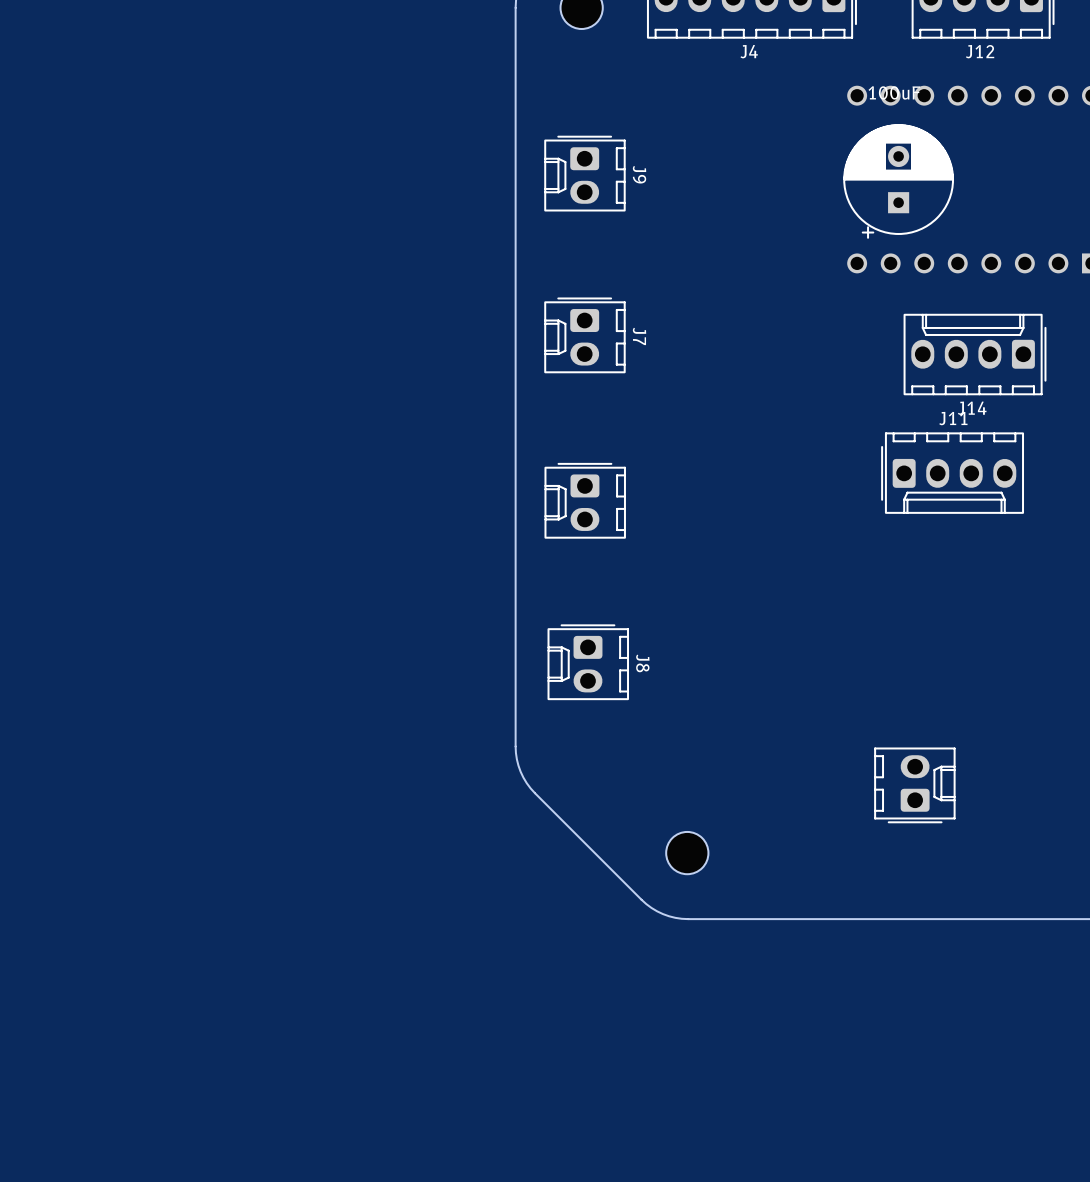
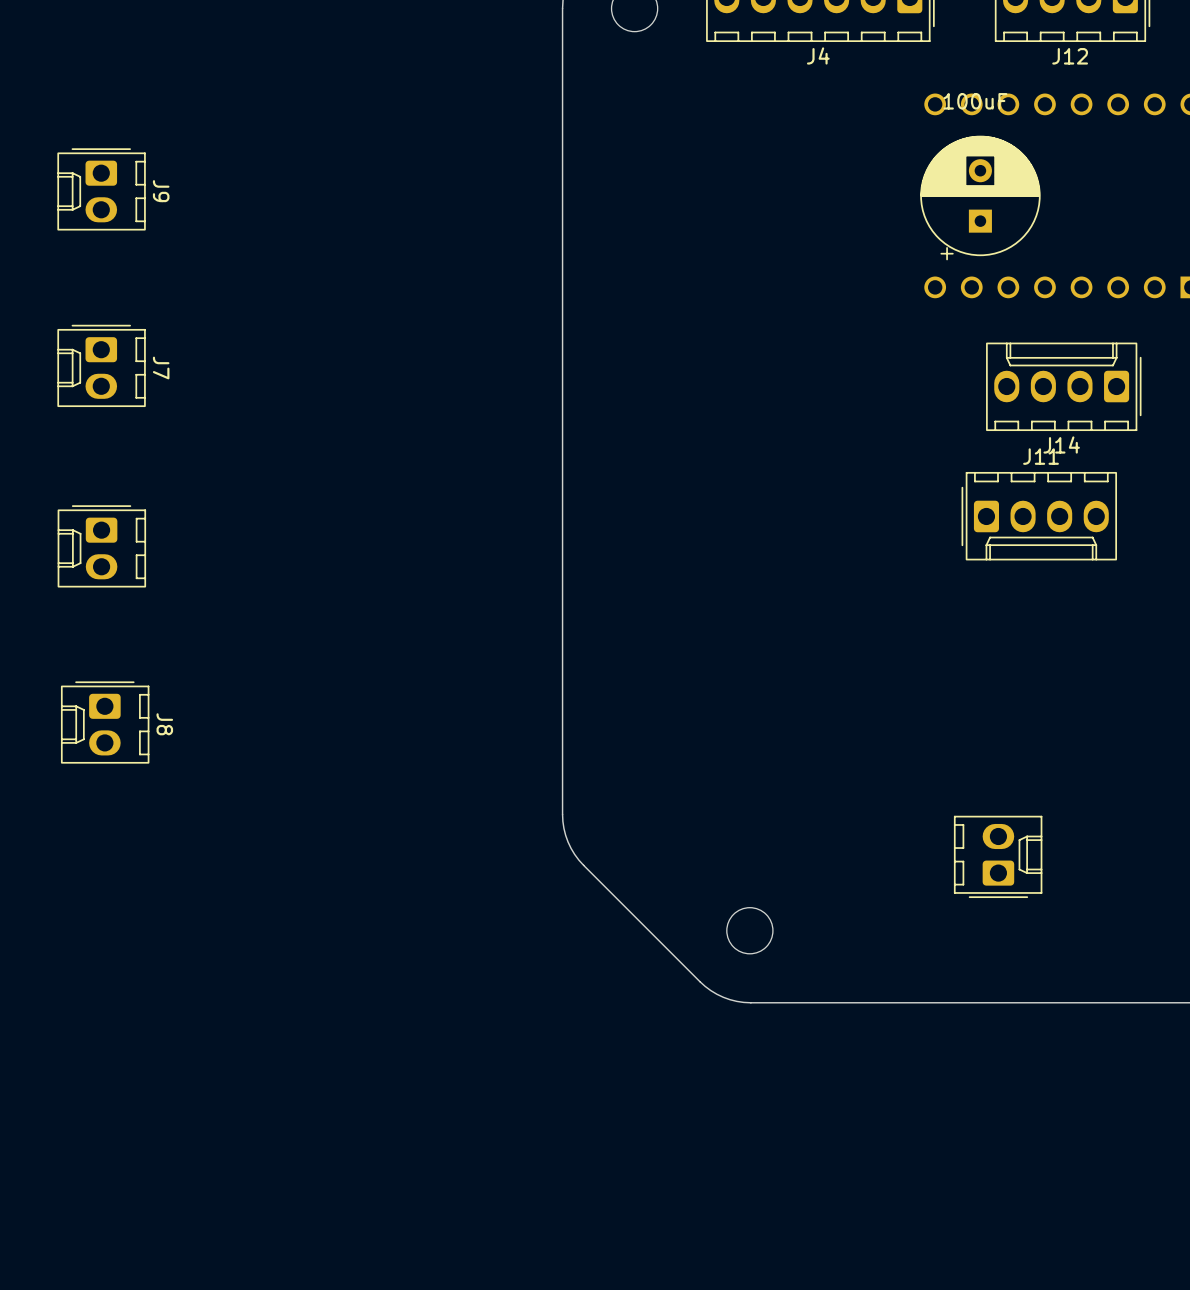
J9 position: (584, 173) -> (101, 189)
J7 position: (584, 335) -> (101, 365)
part: none -> (101, 546)
part: (585, 500) -> none
J8 position: (588, 662) -> (105, 722)

